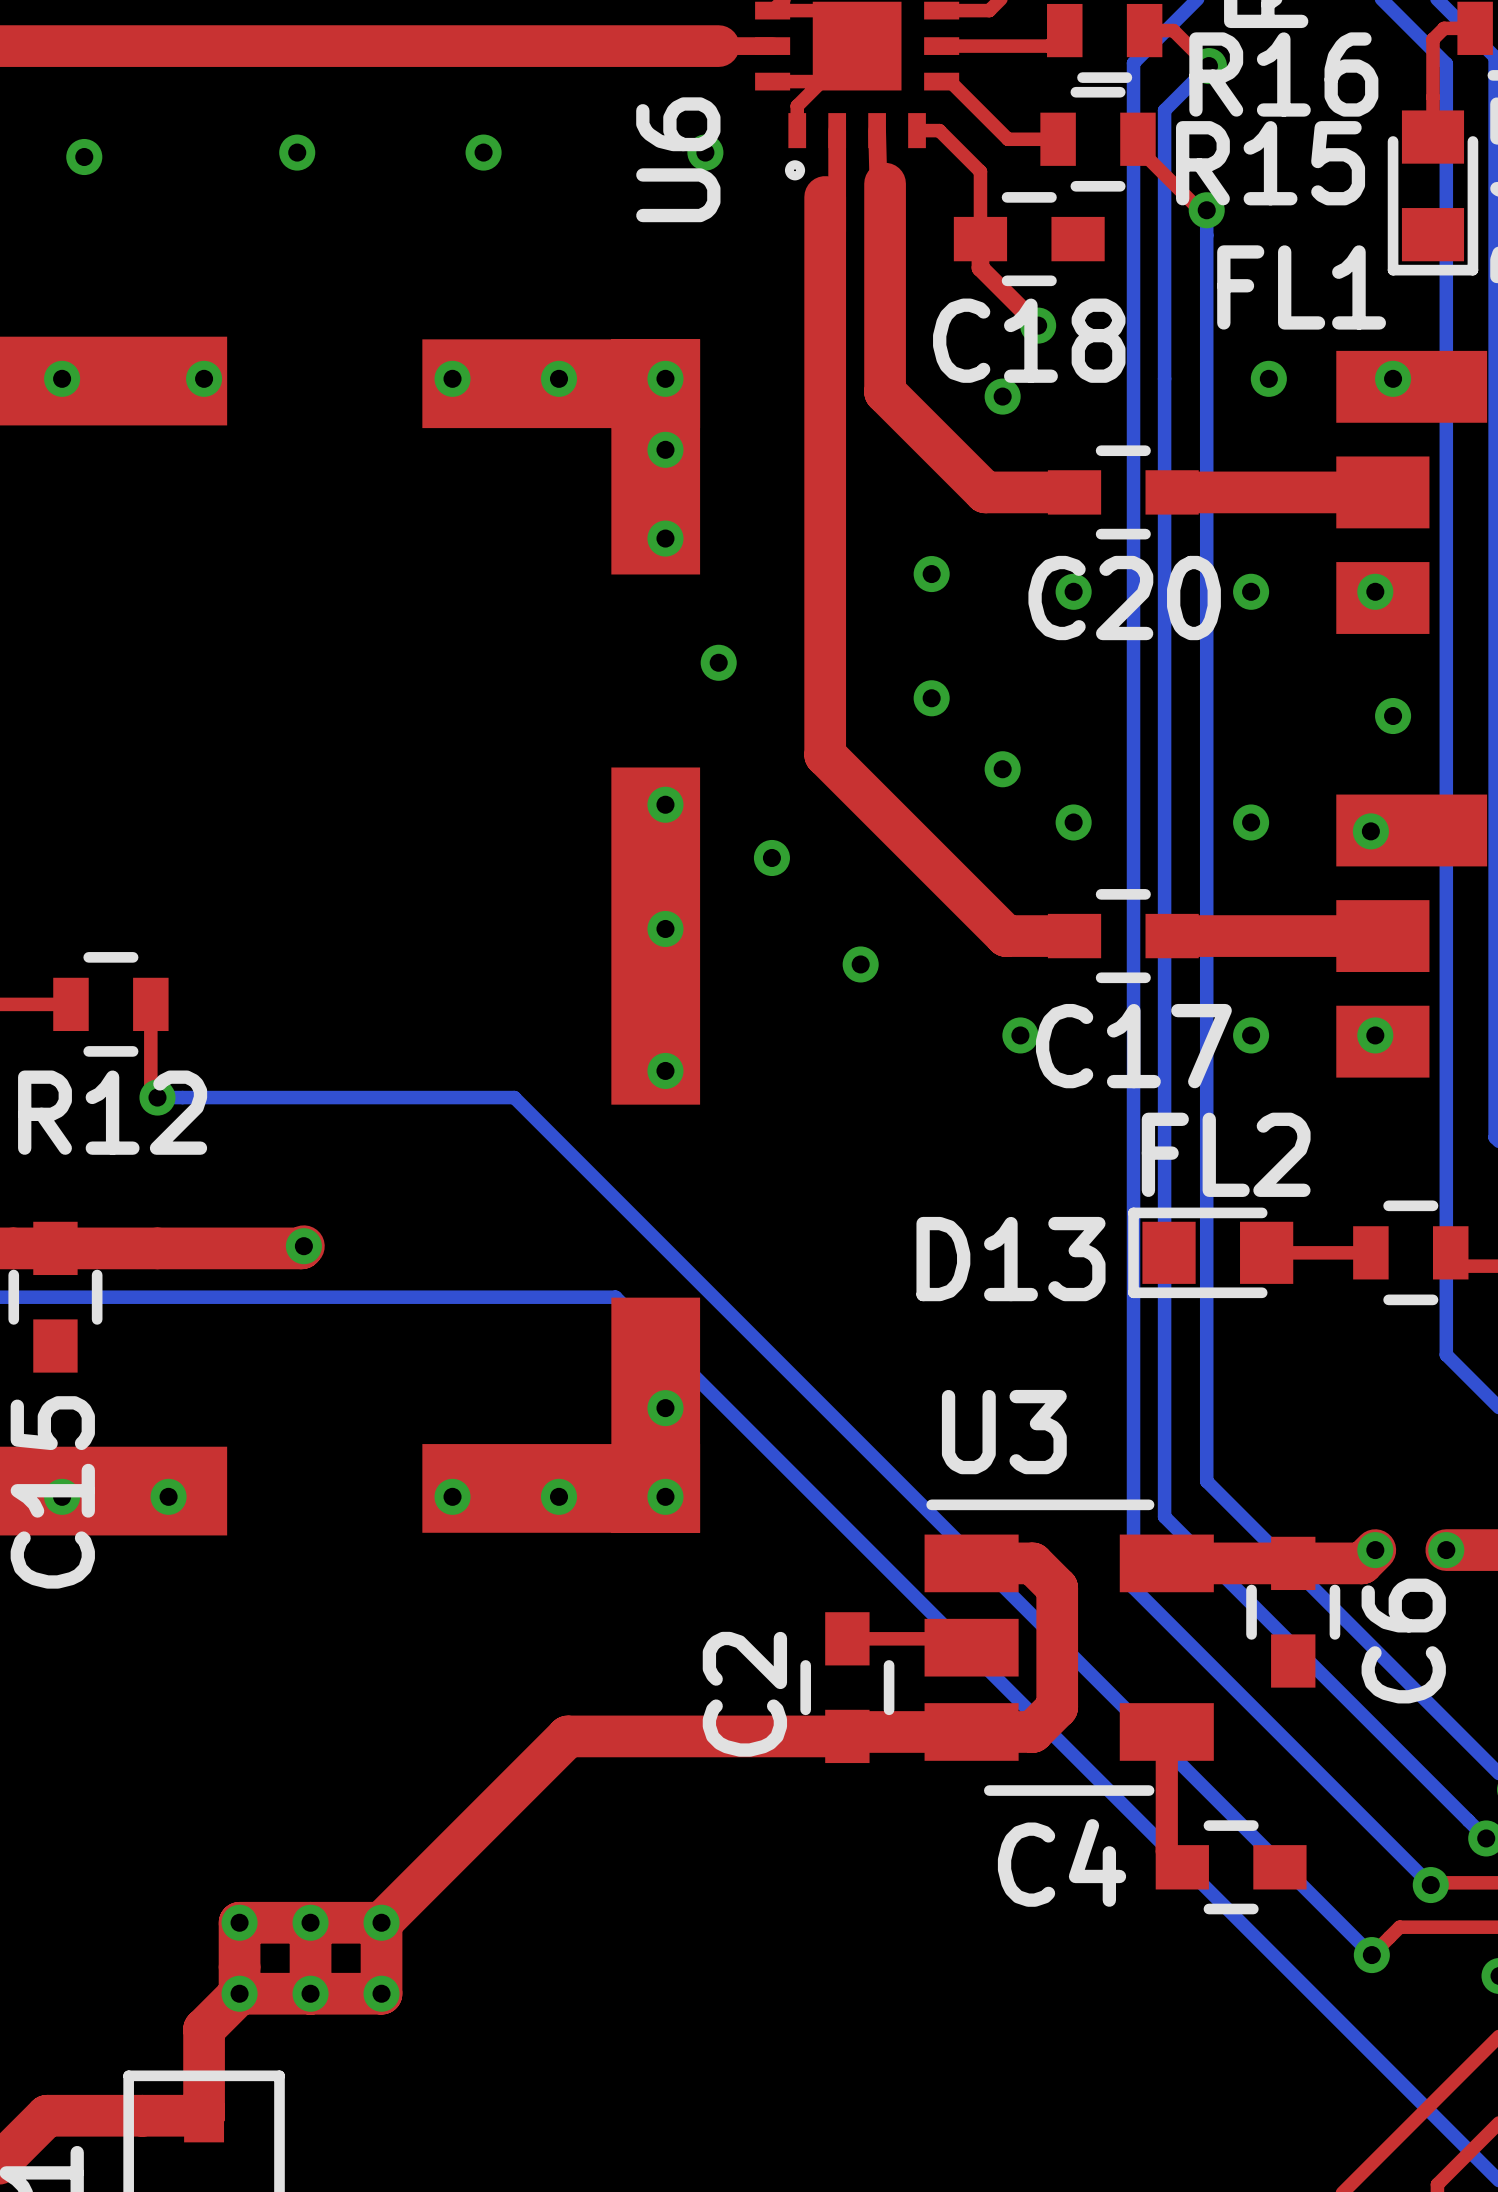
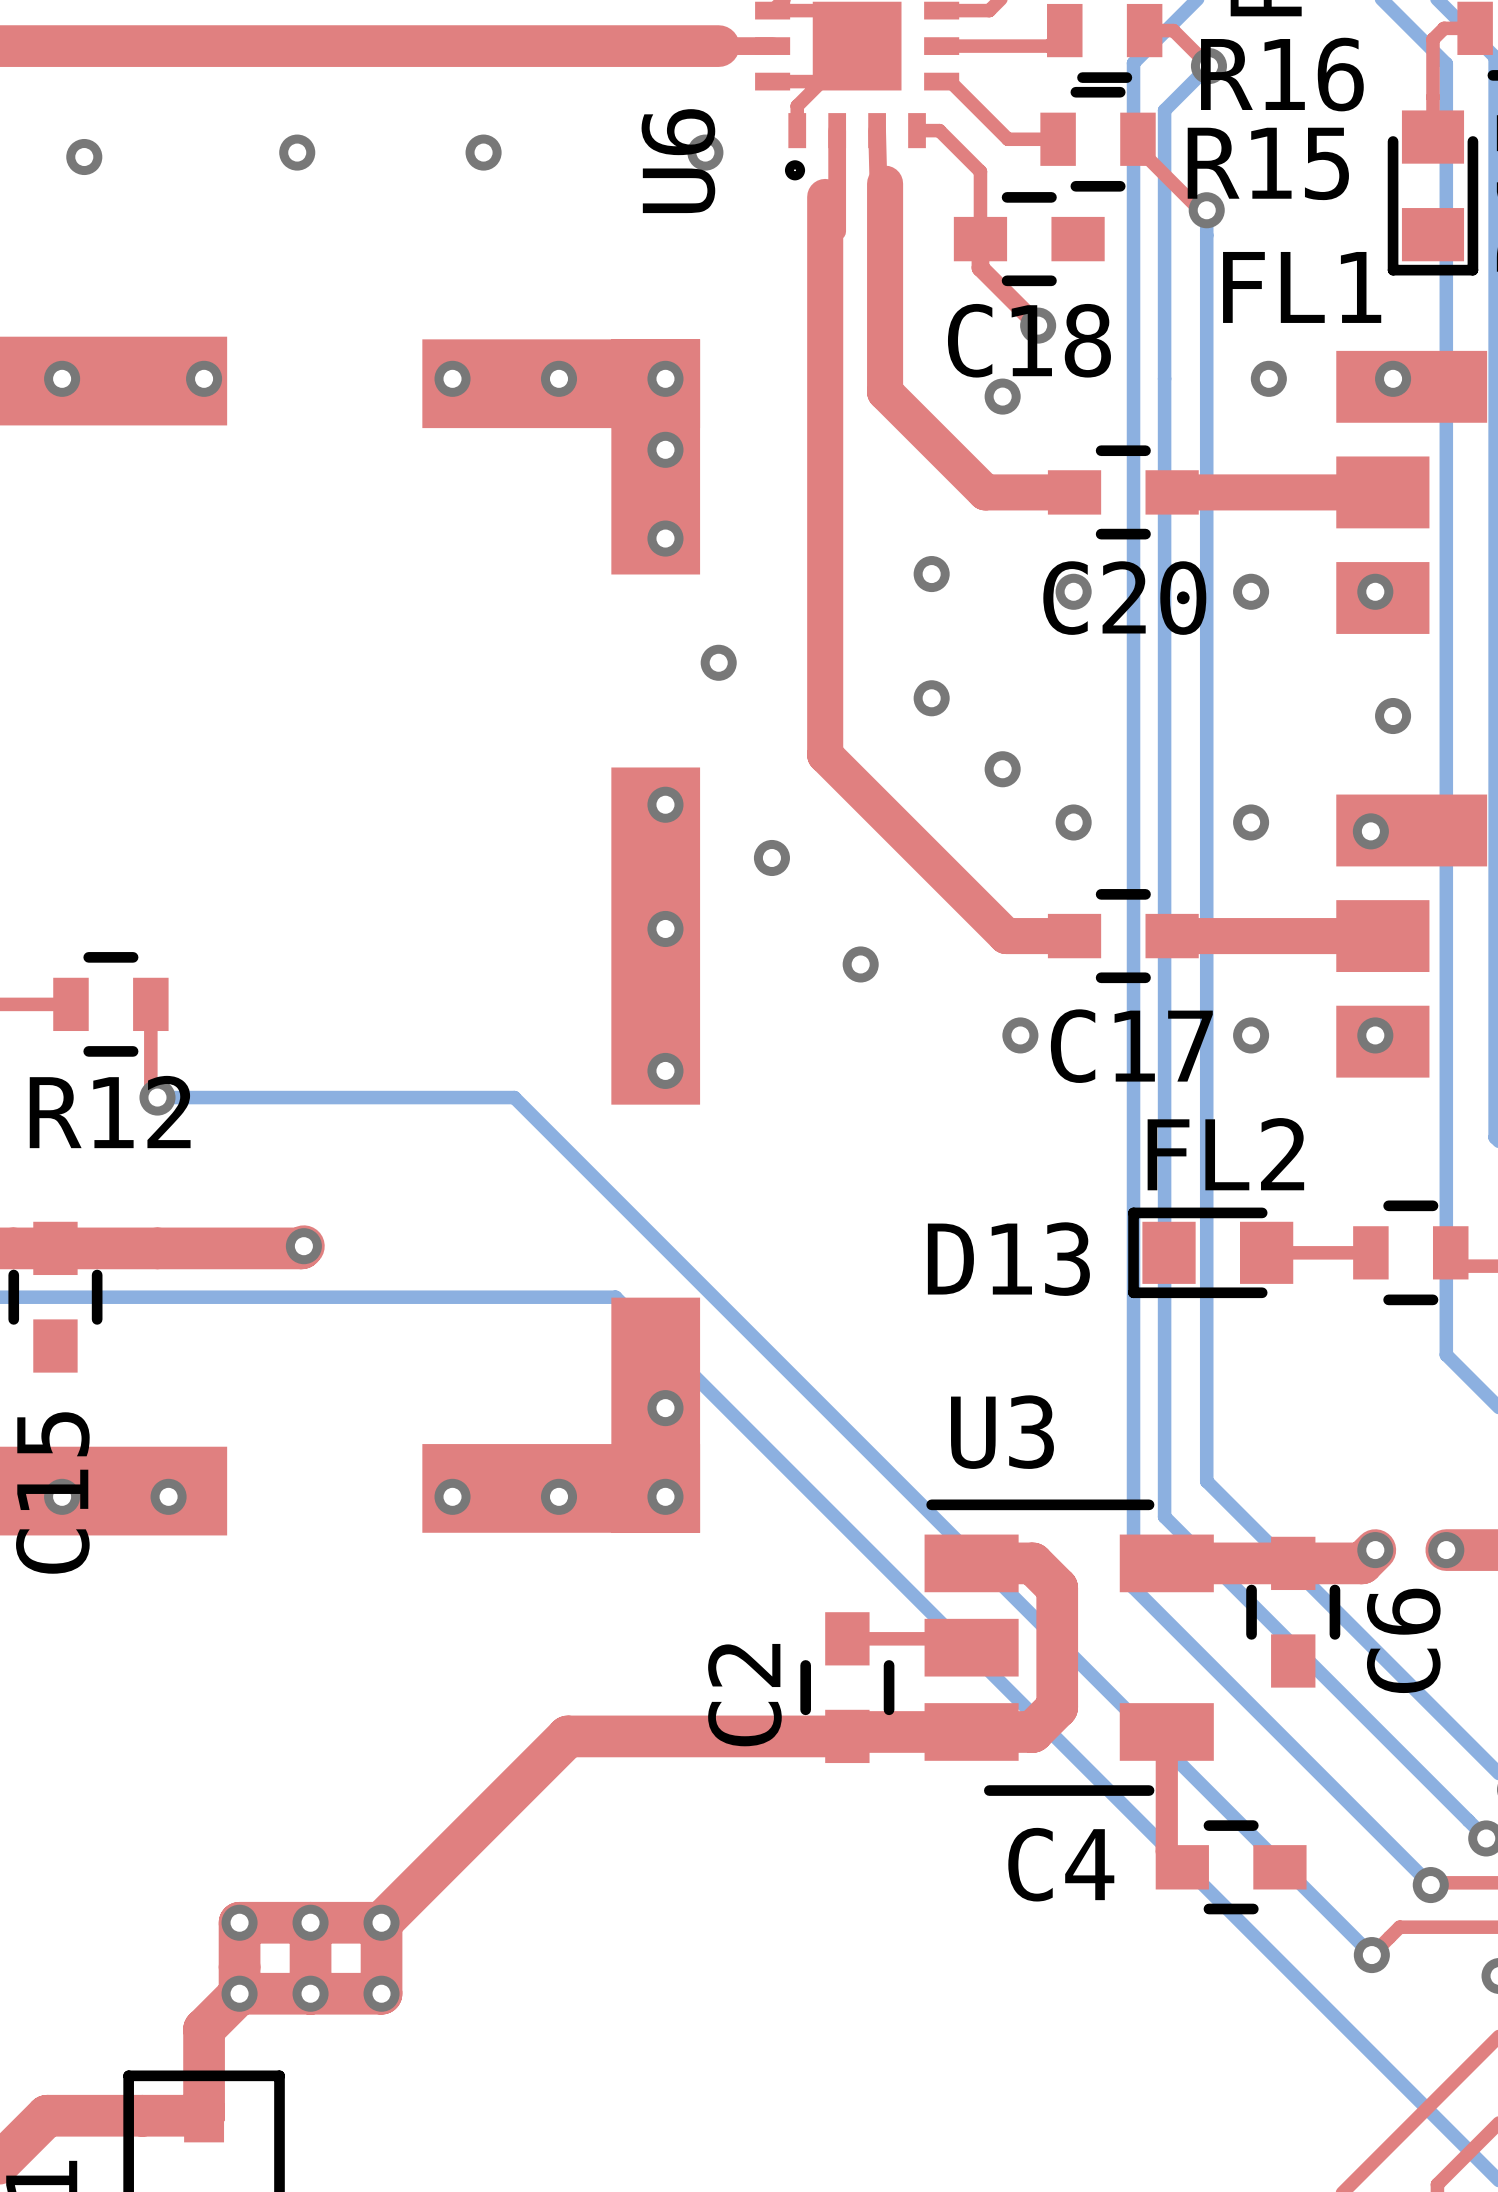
top track width: thick (885, 183) (885, 392) (985, 492) (1074, 492) -> thin (885, 183) (885, 392) (985, 492) (1074, 492)
top track width: thick (825, 196) (825, 755) (1006, 936) (1074, 936) -> thin (825, 196) (825, 755) (1006, 936) (1074, 936)
top track width: thick (1172, 492) (1382, 492) -> thin (1172, 492) (1382, 492)
top track width: thick (1172, 936) (1382, 936) -> thin (1172, 936) (1382, 936)

